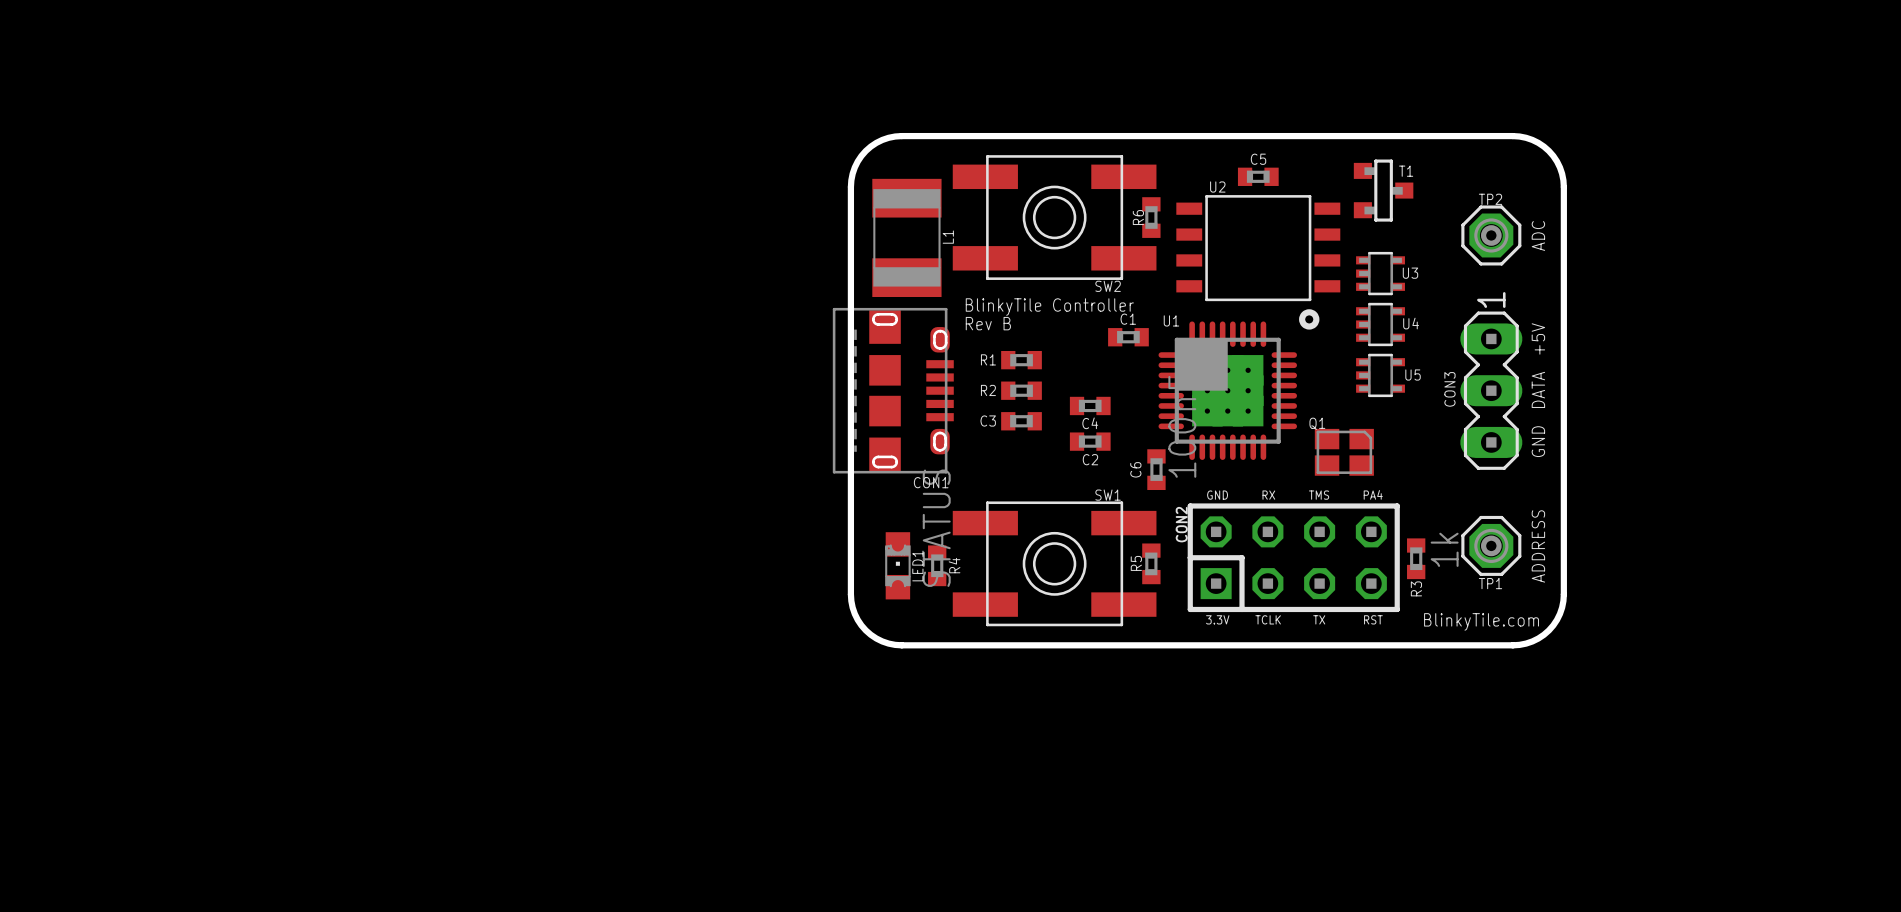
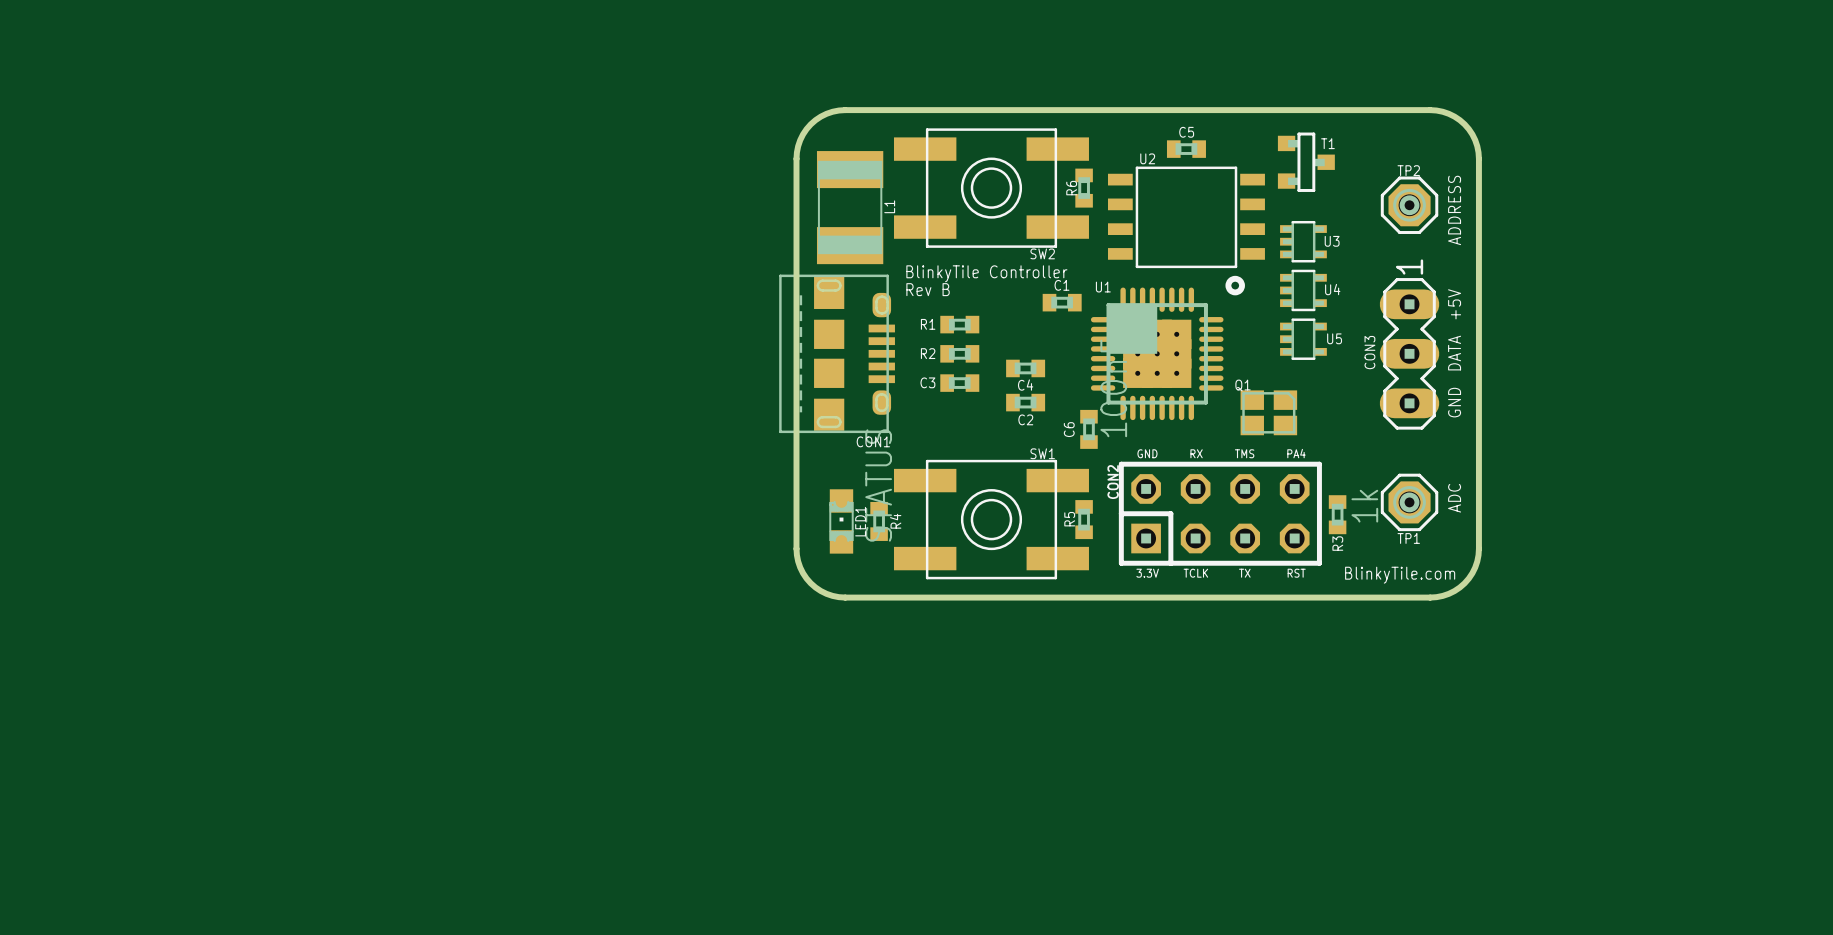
text: ADC (1538, 236) -> ADDRESS (1454, 210)
text: ADDRESS (1538, 546) -> ADC (1454, 498)

